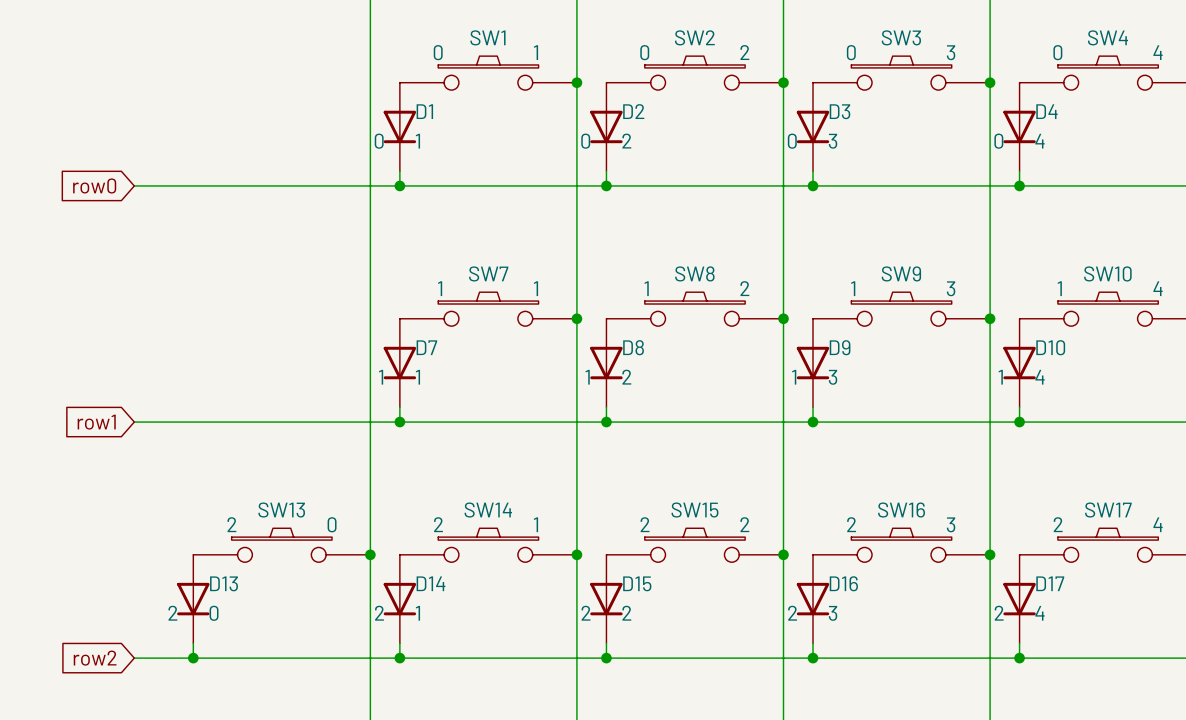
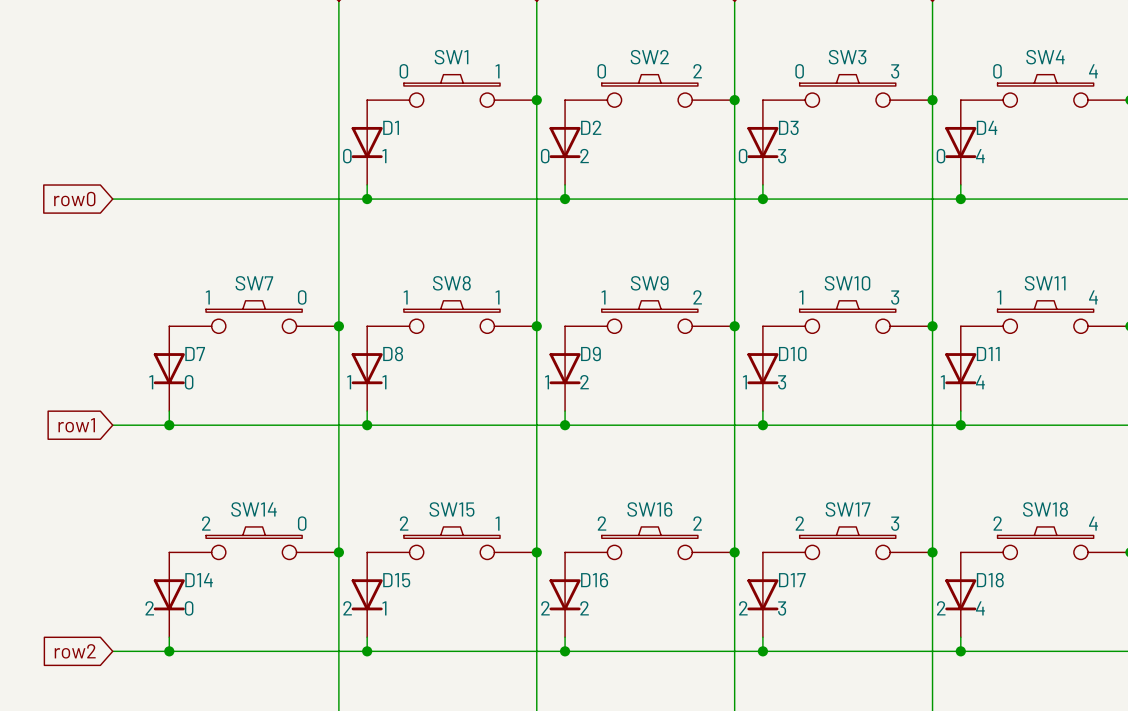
SW7 name: SW7 (488, 273) -> SW8 (451, 283)
SW8 name: SW8 (694, 273) -> SW9 (649, 283)
SW9 name: SW9 (901, 273) -> SW10 (847, 283)
SW10 name: SW10 (1107, 273) -> SW11 (1045, 283)
SW7: none -> (254, 317)
junction: none -> (338, 326)
D7 name: D7 (426, 347) -> D8 (393, 353)
D8 name: D8 (633, 347) -> D9 (590, 354)
D9 name: D9 (840, 347) -> D10 (792, 354)
D10 name: D10 (1050, 347) -> D11 (988, 353)
D7: none -> (169, 368)
wire: none -> (169, 411) (169, 425)
junction: none -> (169, 425)
SW13 name: SW13 (281, 510) -> SW14 (254, 509)
SW14 name: SW14 (488, 510) -> SW15 (451, 509)
SW15 name: SW15 (694, 510) -> SW16 (649, 509)
SW16 name: SW16 (901, 510) -> SW17 (848, 509)
SW17 name: SW17 (1108, 510) -> SW18 (1045, 509)
D13 name: D13 (224, 583) -> D14 (199, 580)
D14 name: D14 (430, 583) -> D15 (396, 580)
D15 name: D15 (637, 583) -> D16 (594, 580)
D16 name: D16 (843, 583) -> D17 (792, 580)
D17 name: D17 (1050, 583) -> D18 (990, 580)

